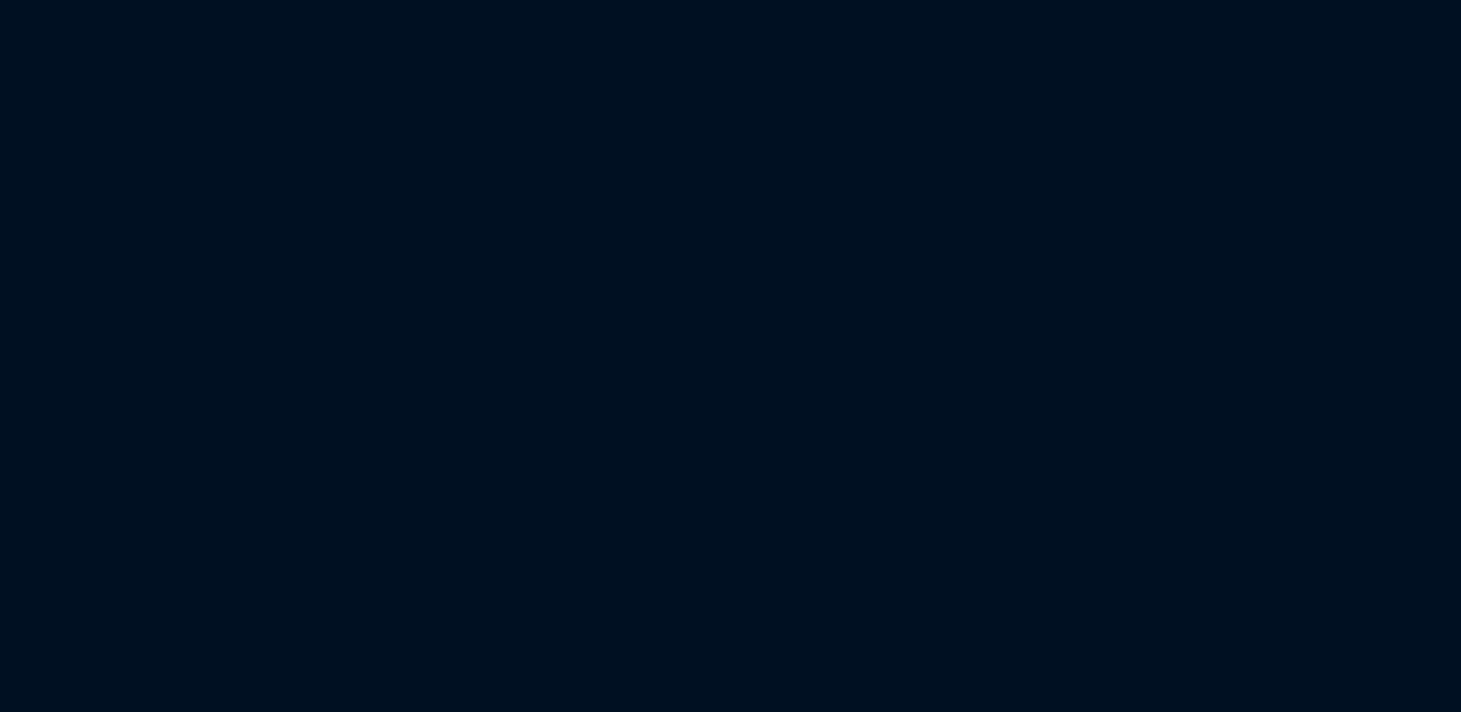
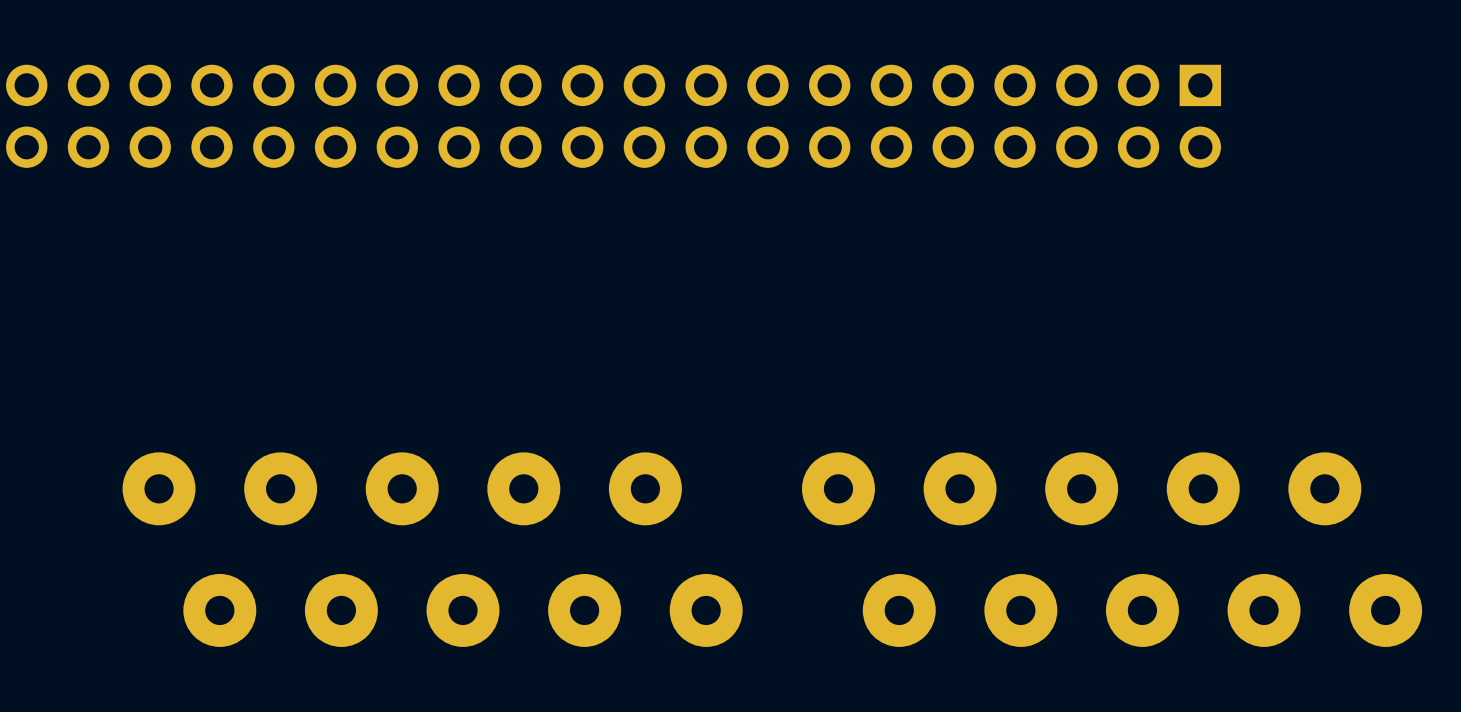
part: none -> (613, 116)
part: none -> (432, 549)
part: none -> (1112, 549)

